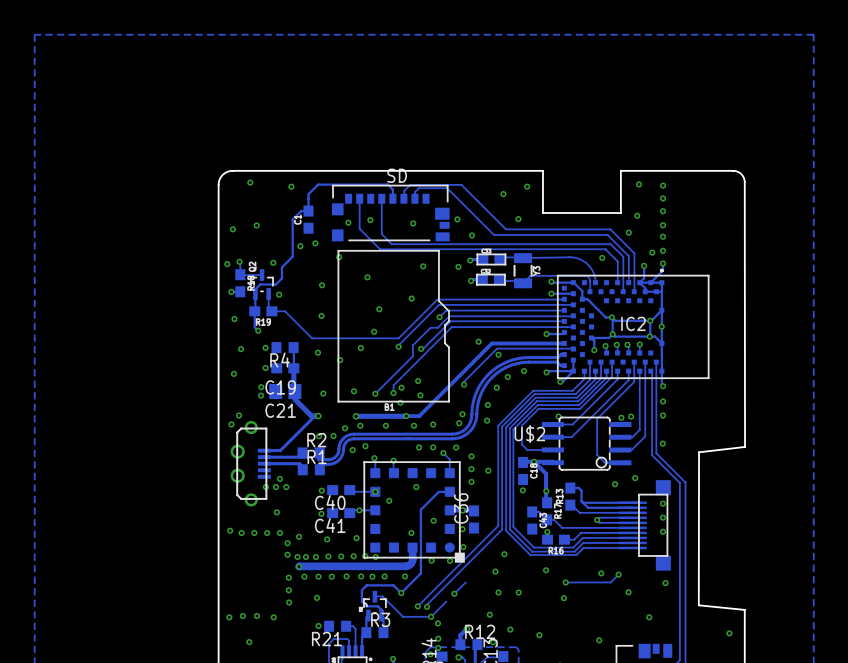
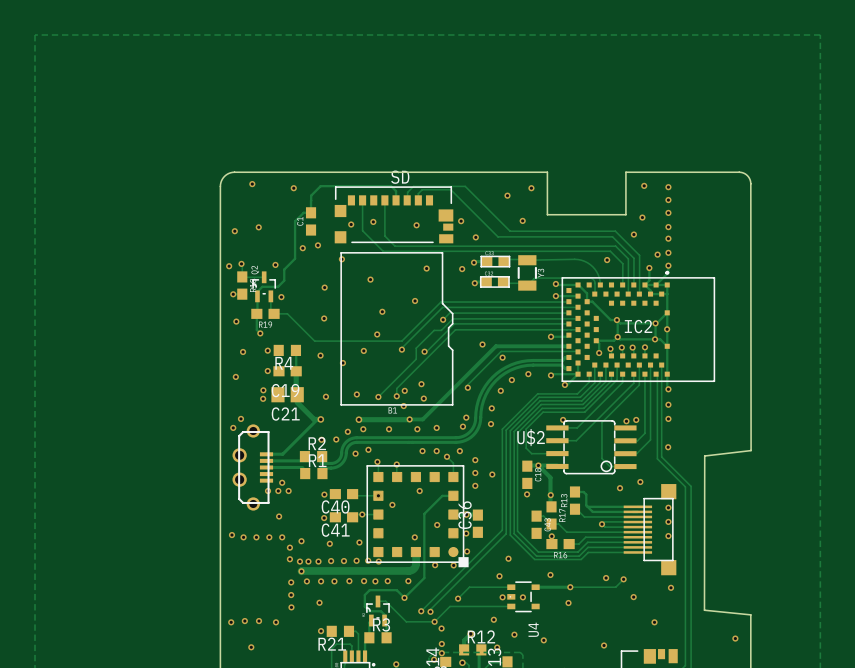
track: none -> (511, 587) (469, 587)
track: none -> (570, 587) (535, 587)
U4: none -> (523, 596)
track: none -> (511, 606) (449, 606)

